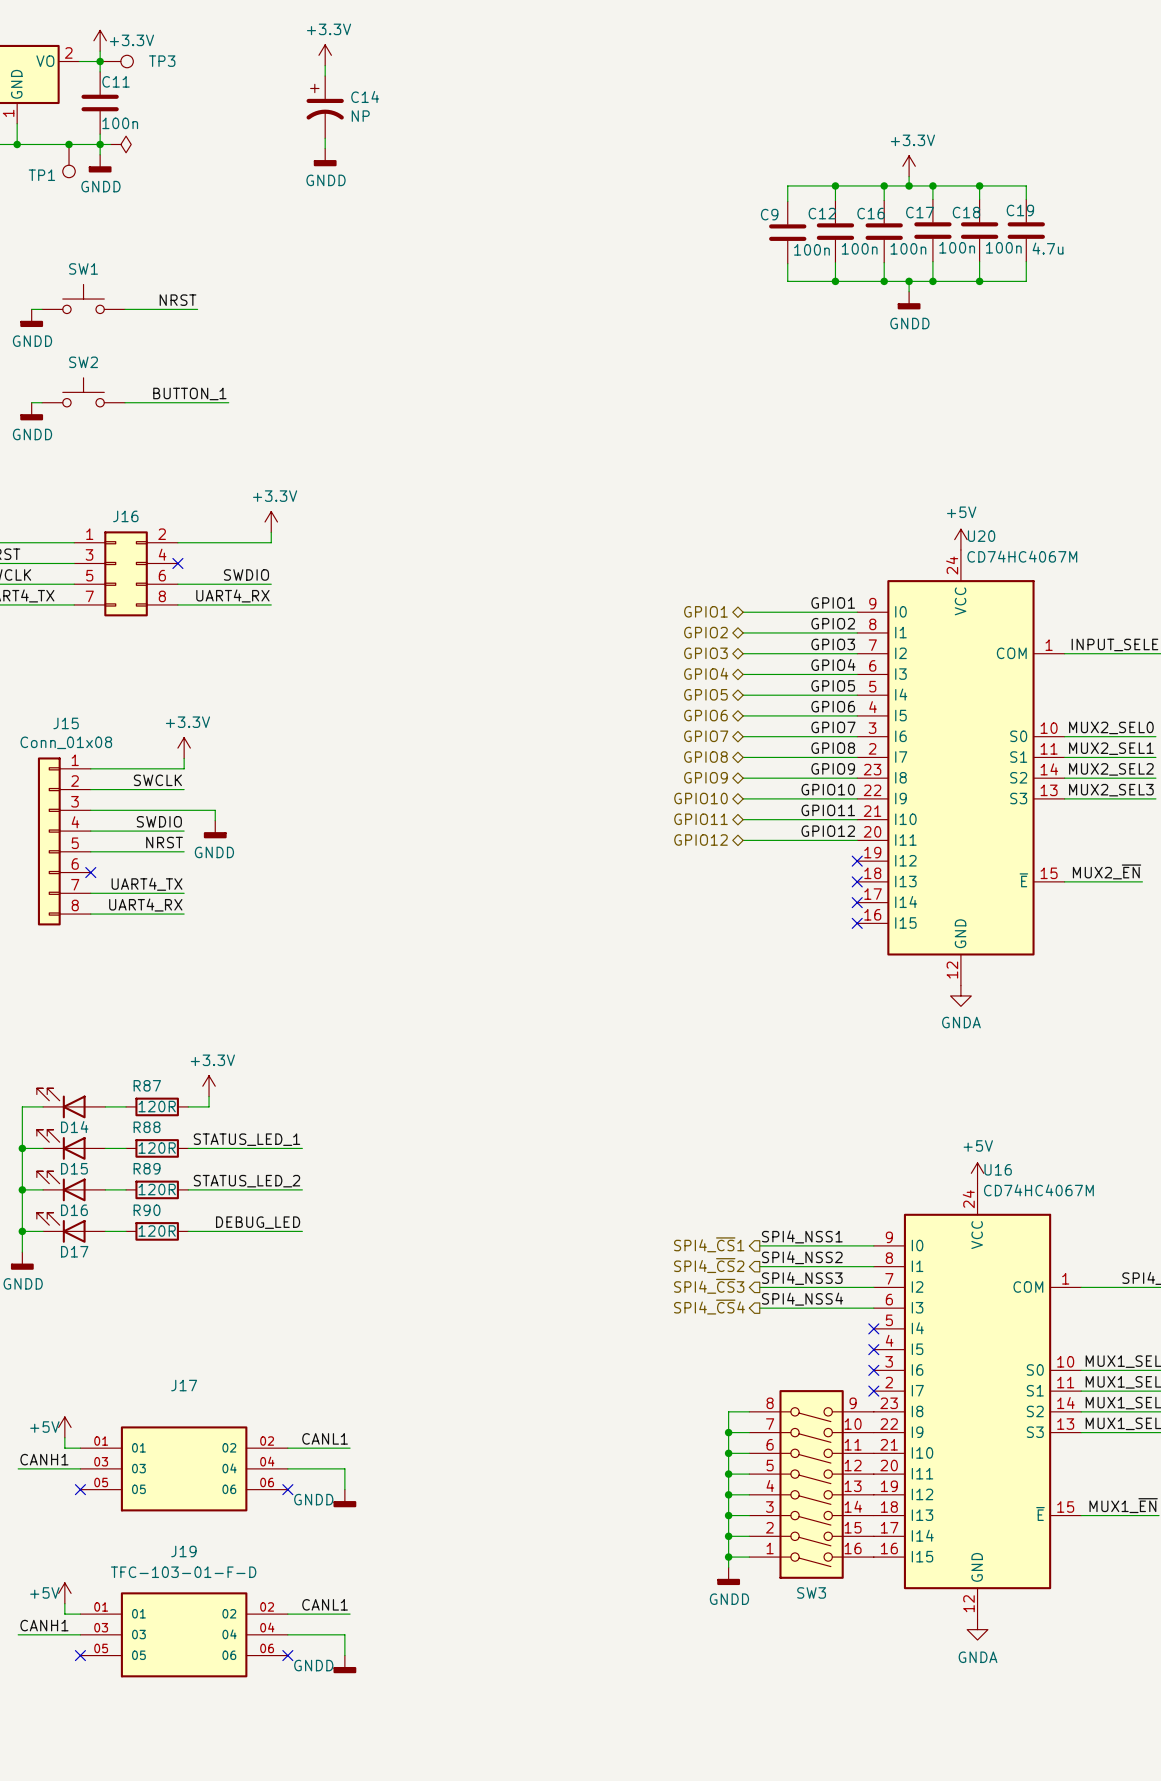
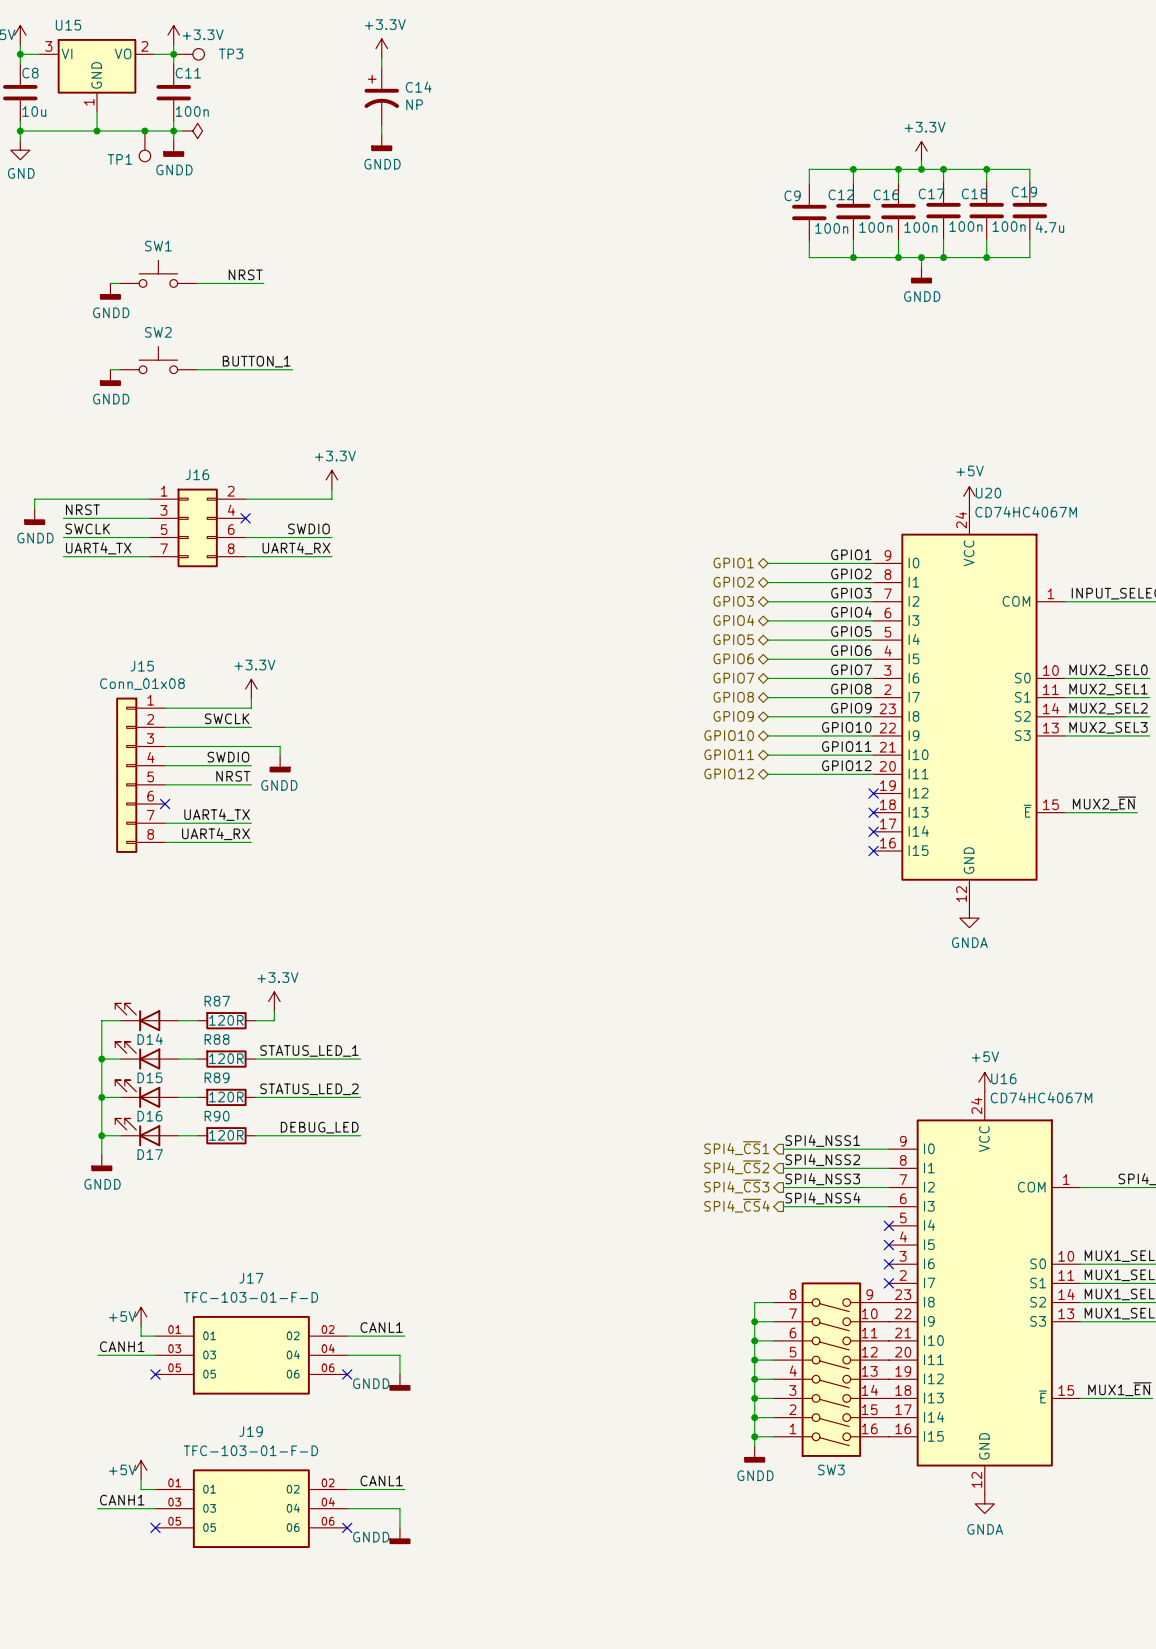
J17 value: none -> TFC-103-01-F-D (250, 1297)

